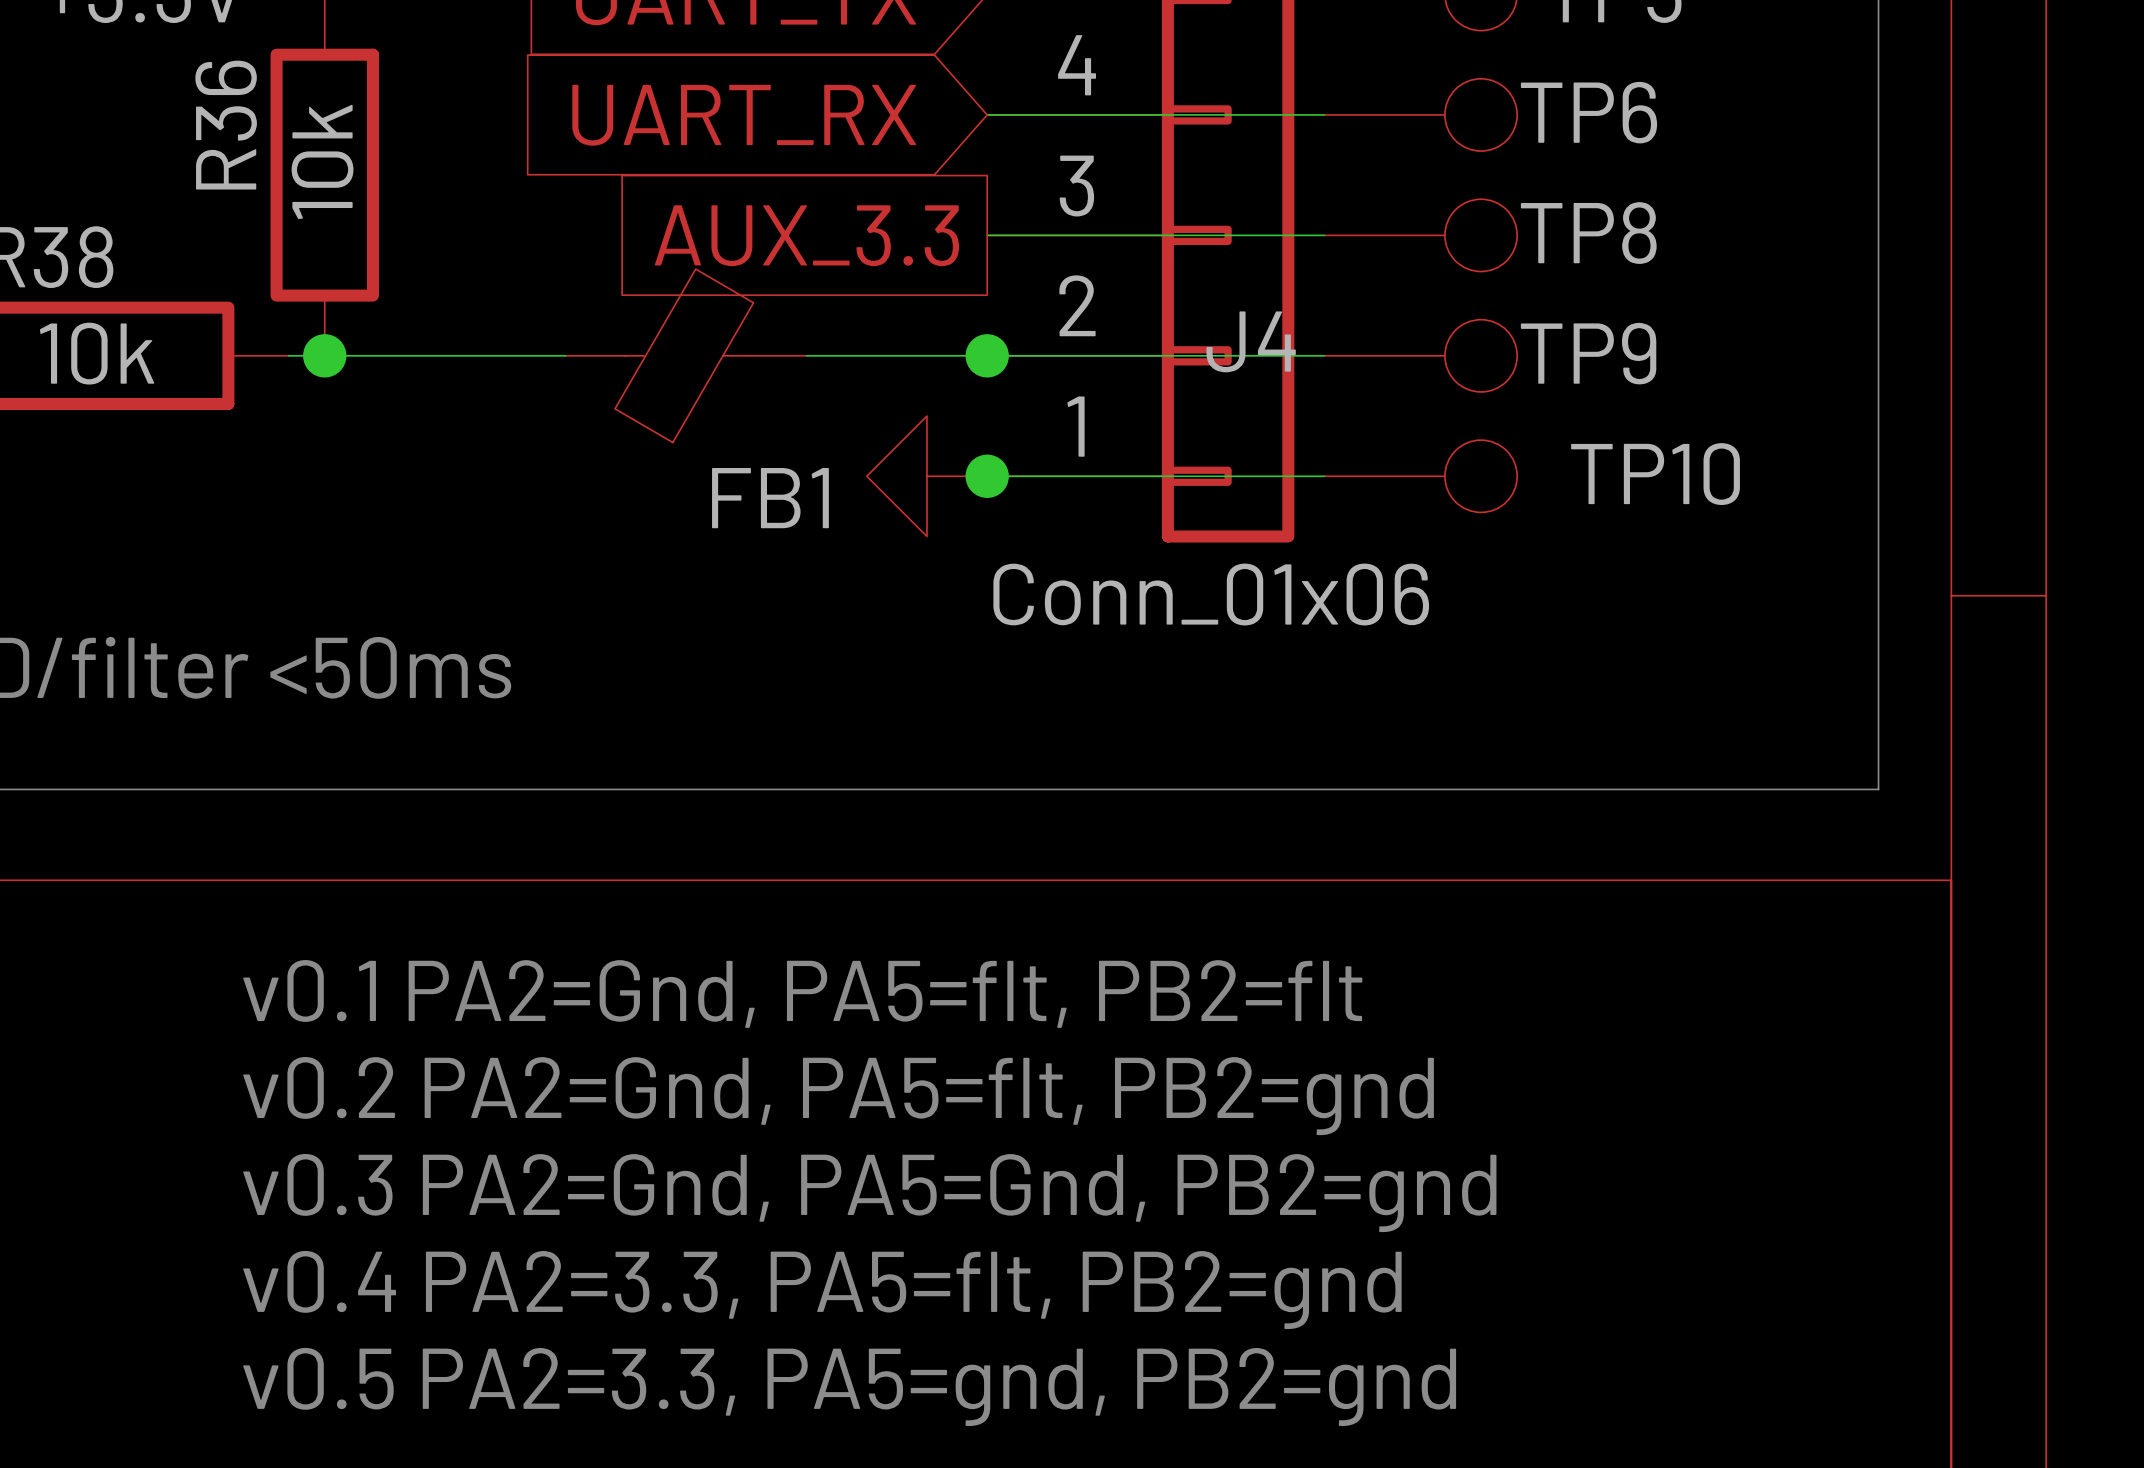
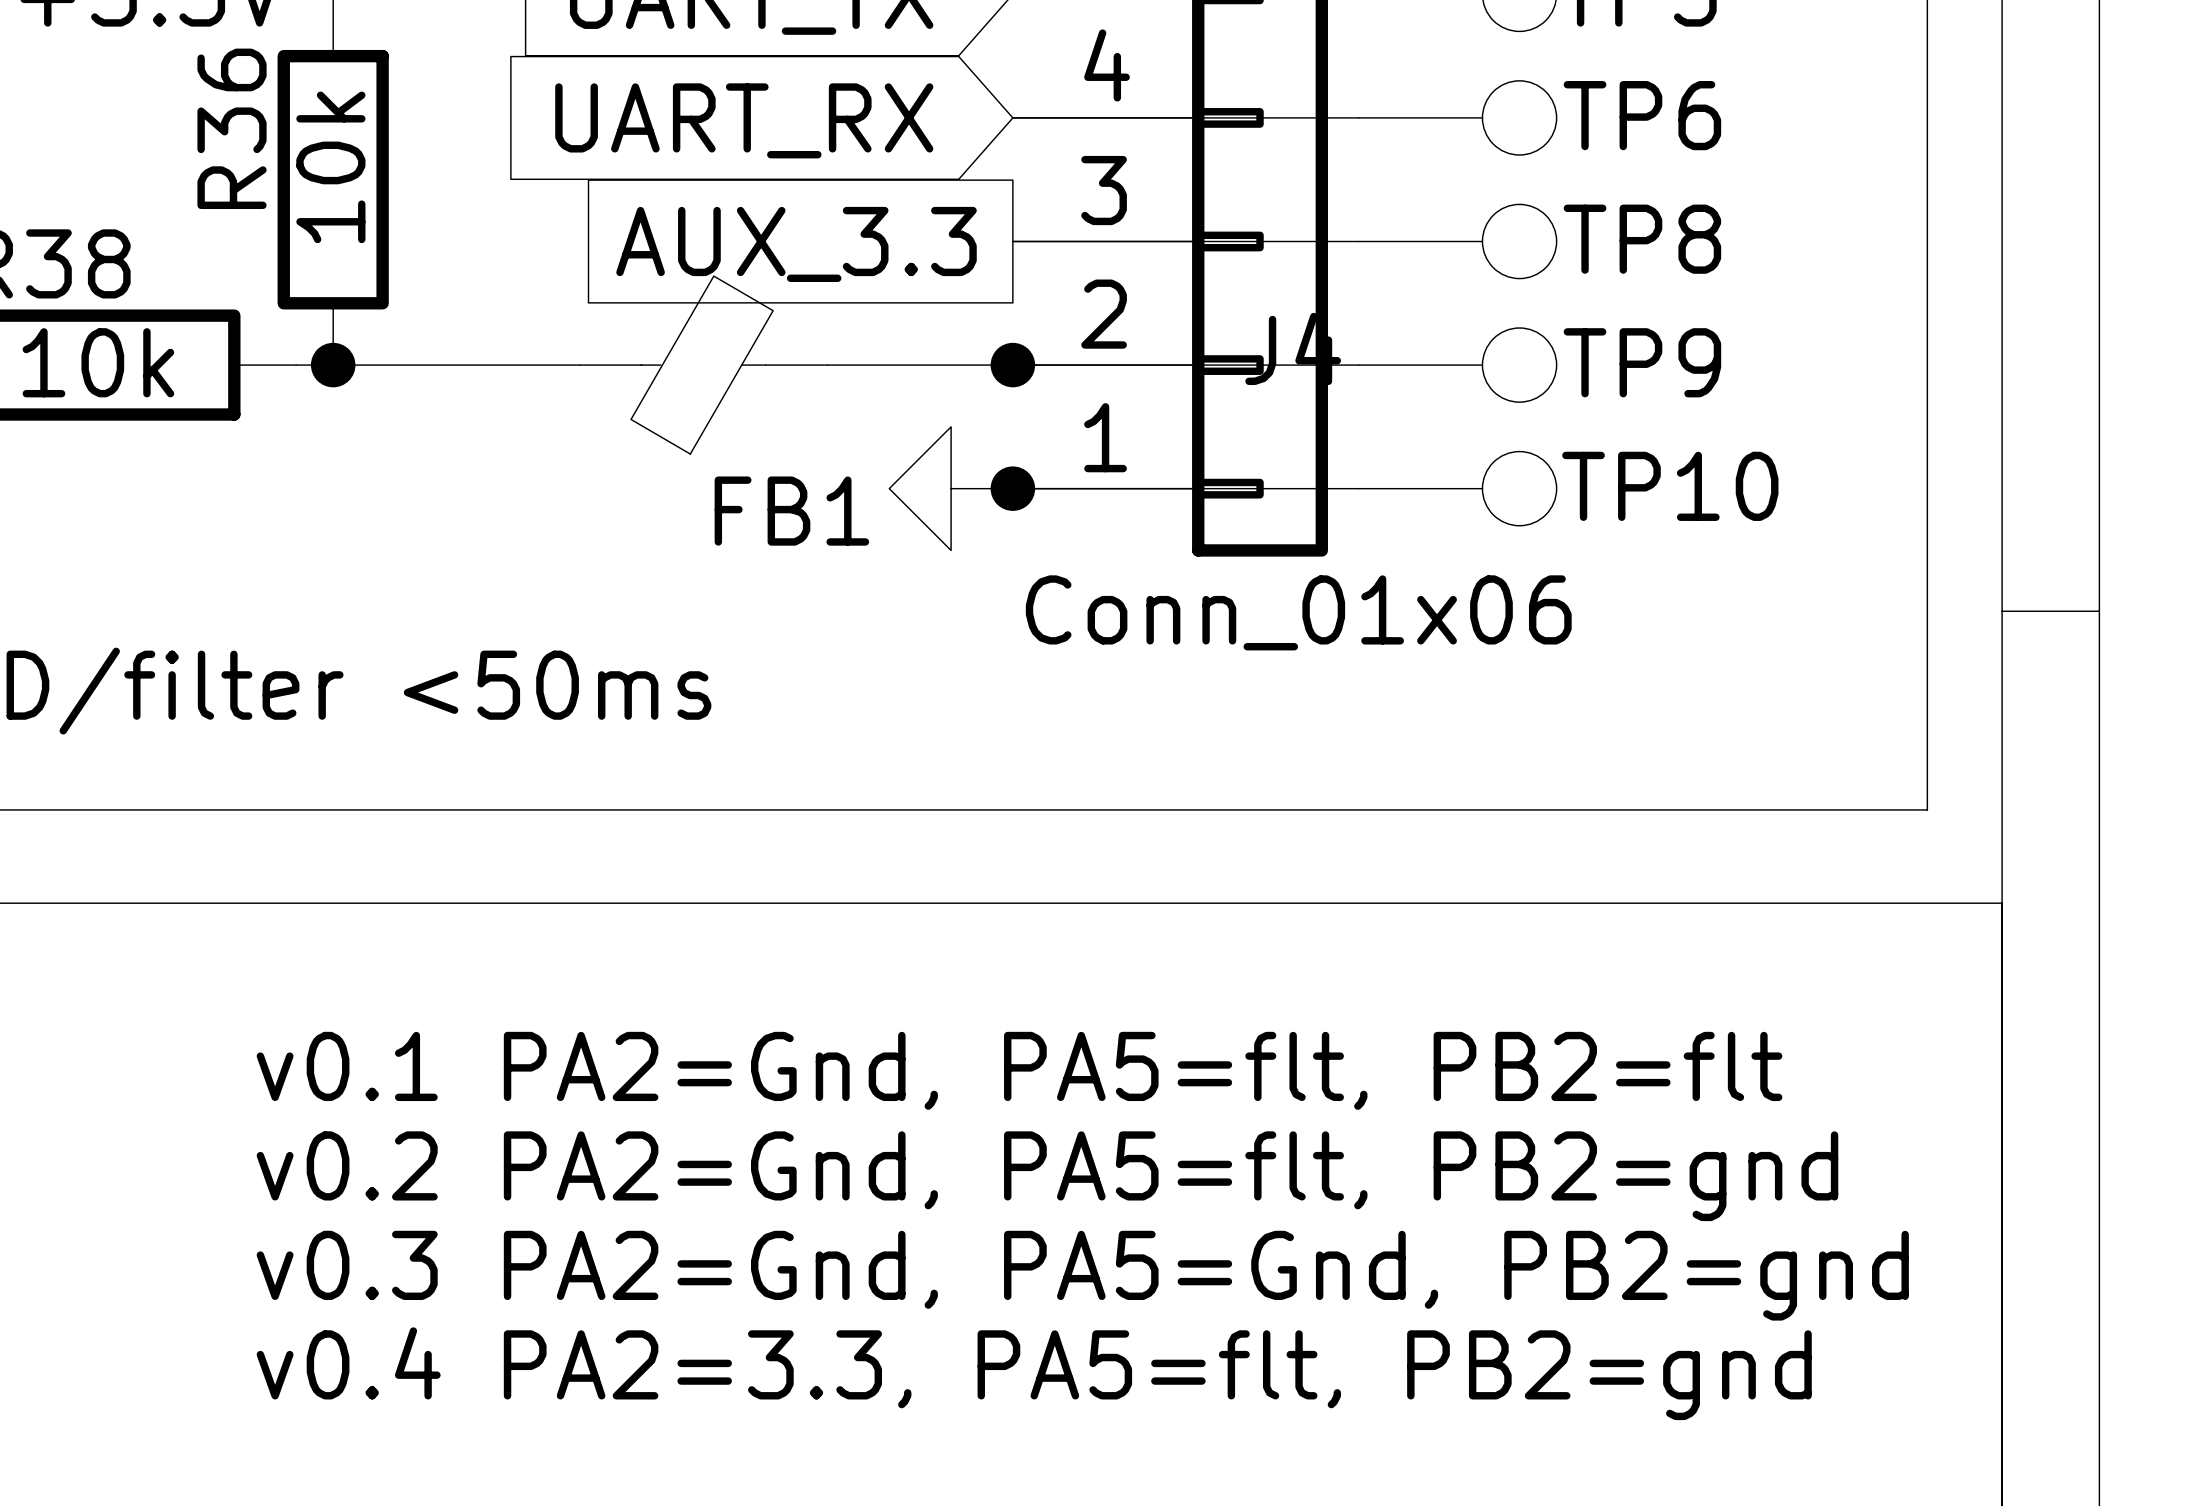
text position: v0.1 PA2=Gnd, PA5=flt, PB2=flt (802, 993) -> v0.1 PA2=Gnd, PA5=flt, PB2=flt (1019, 1070)
text position: v0.2 PA2=Gnd, PA5=flt, PB2=gnd (838, 1096) -> v0.2 PA2=Gnd, PA5=flt, PB2=gnd (1047, 1176)
text position: v0.3 PA2=Gnd, PA5=Gnd, PB2=gnd (869, 1193) -> v0.3 PA2=Gnd, PA5=Gnd, PB2=gnd (1082, 1275)
text position: v0.4 PA2=3.3, PA5=flt, PB2=gnd (822, 1289) -> v0.4 PA2=3.3, PA5=flt, PB2=gnd (1034, 1373)
text: v0.5 PA2=3.3, PA5=gnd, PB2=gnd (849, 1386) -> none

